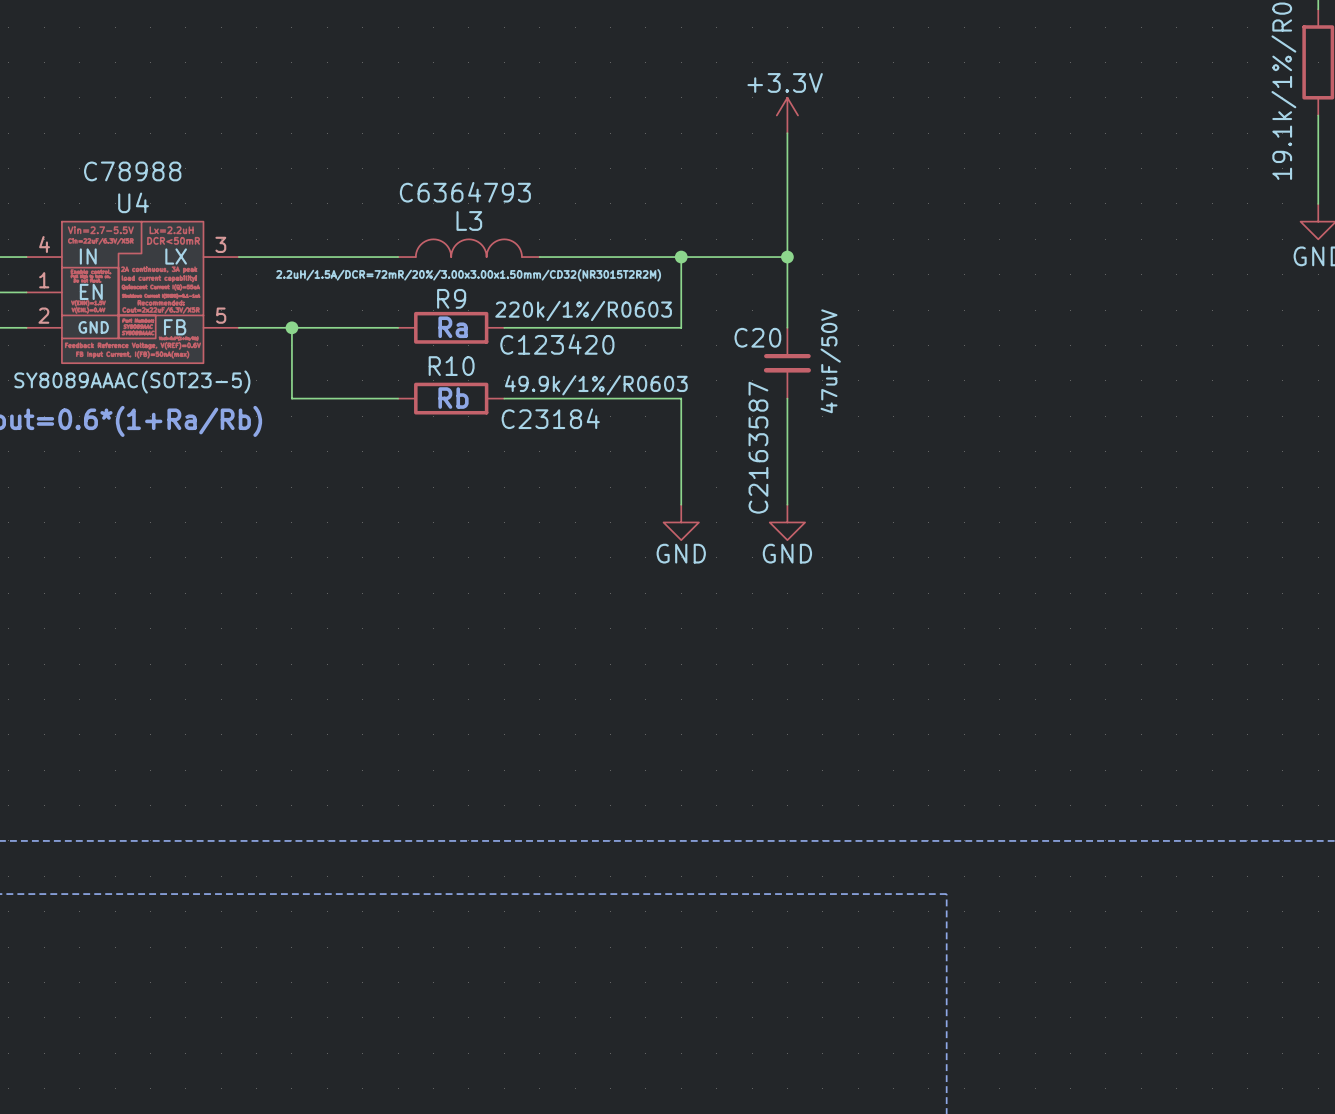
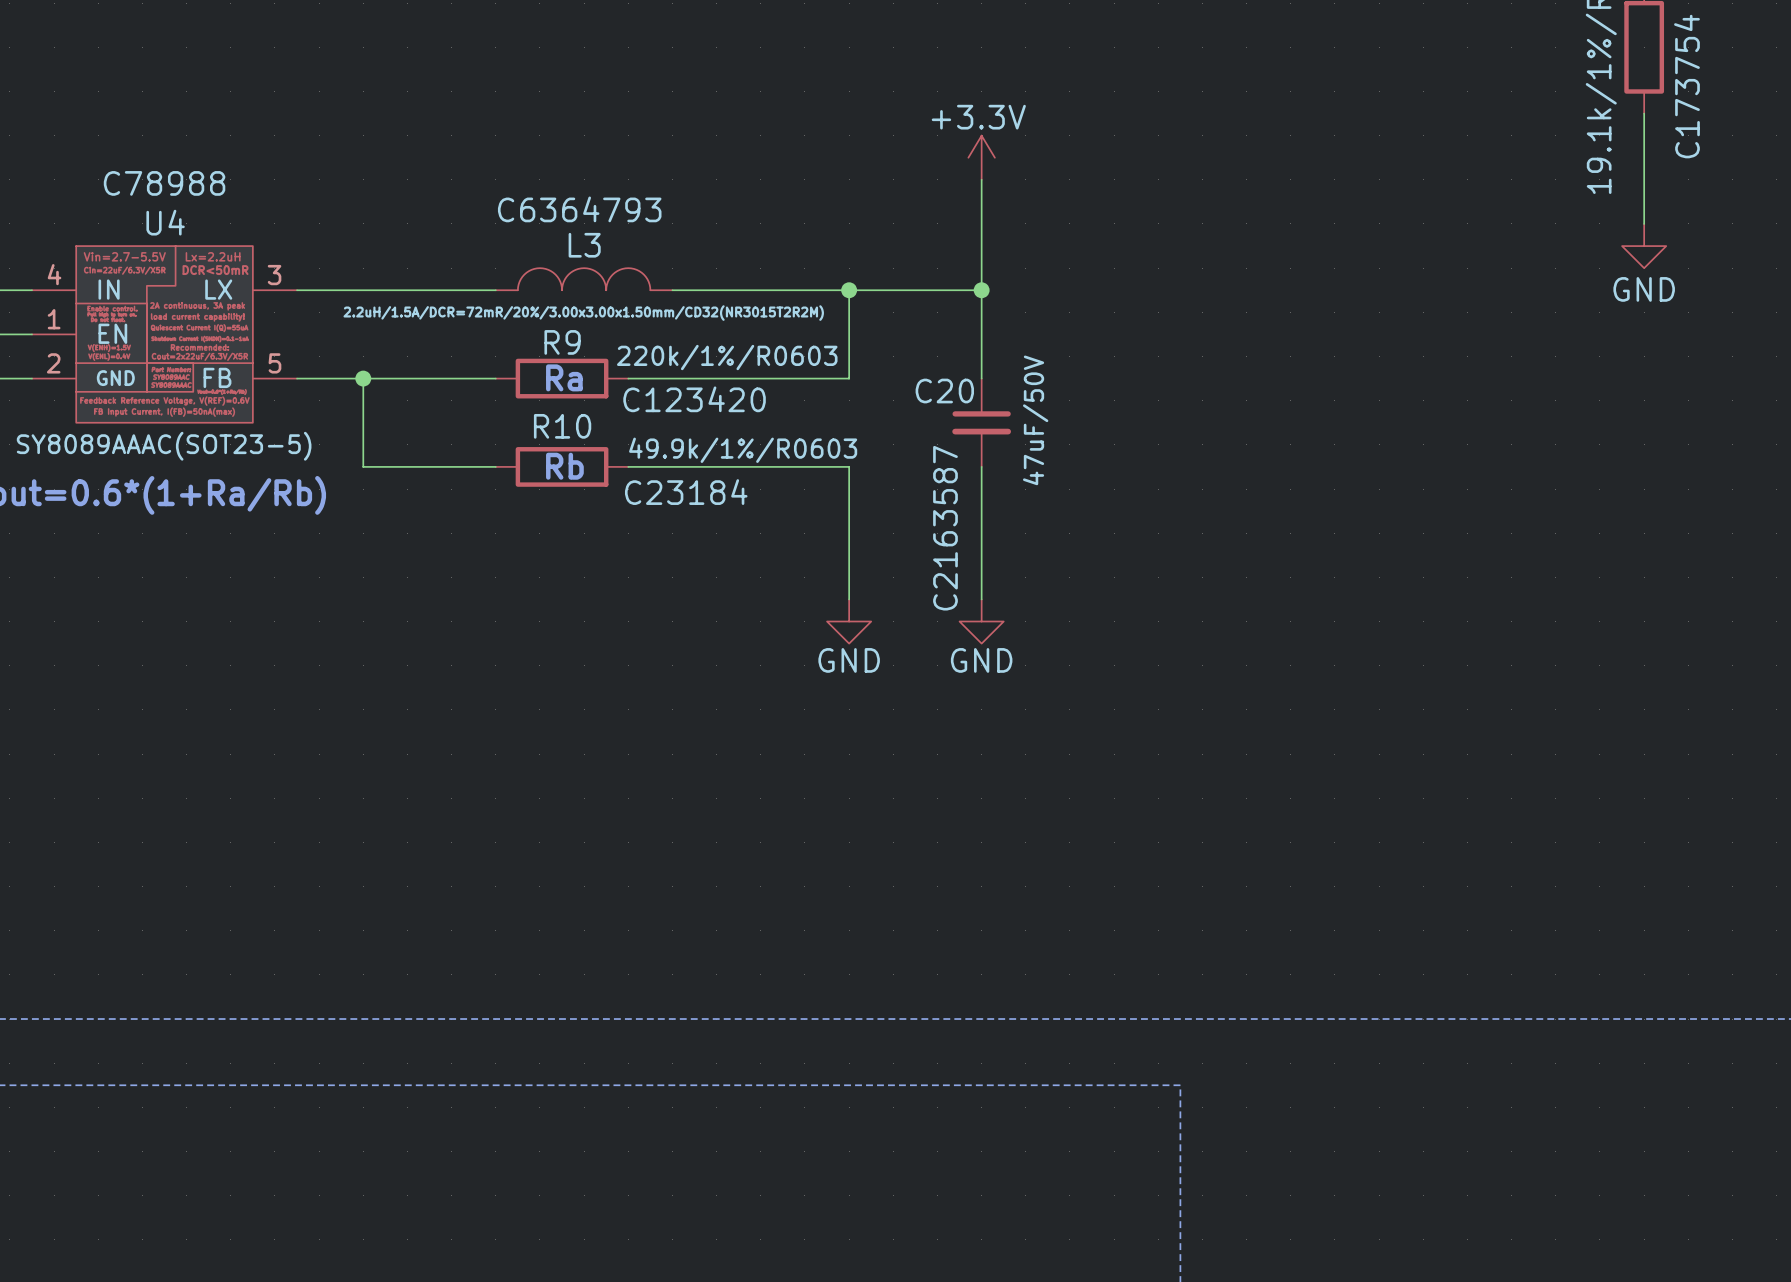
power symbol position: +3.3V (787, 115) -> +3.3V (981, 157)

